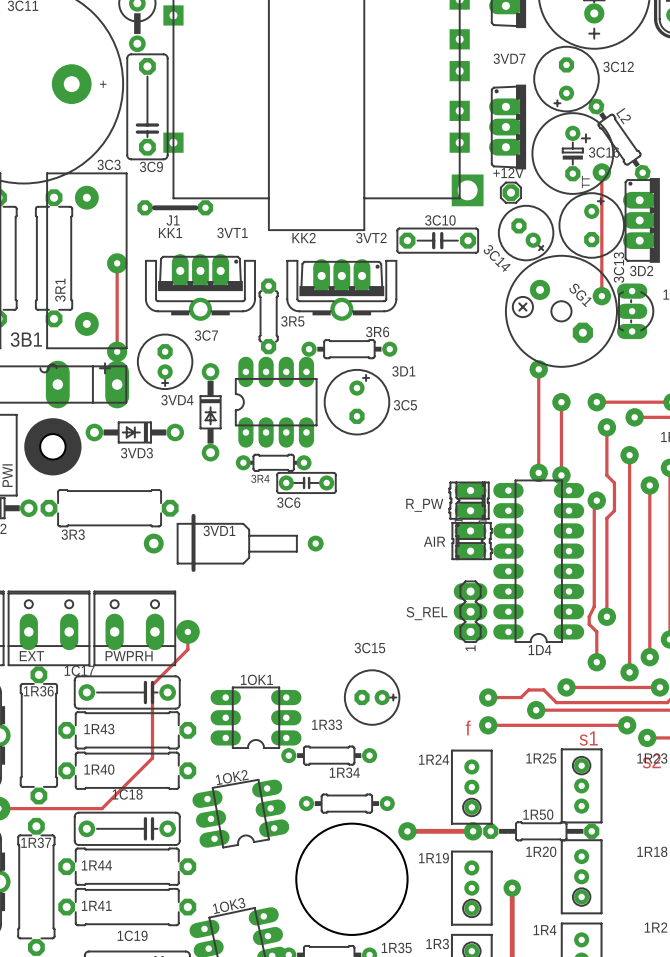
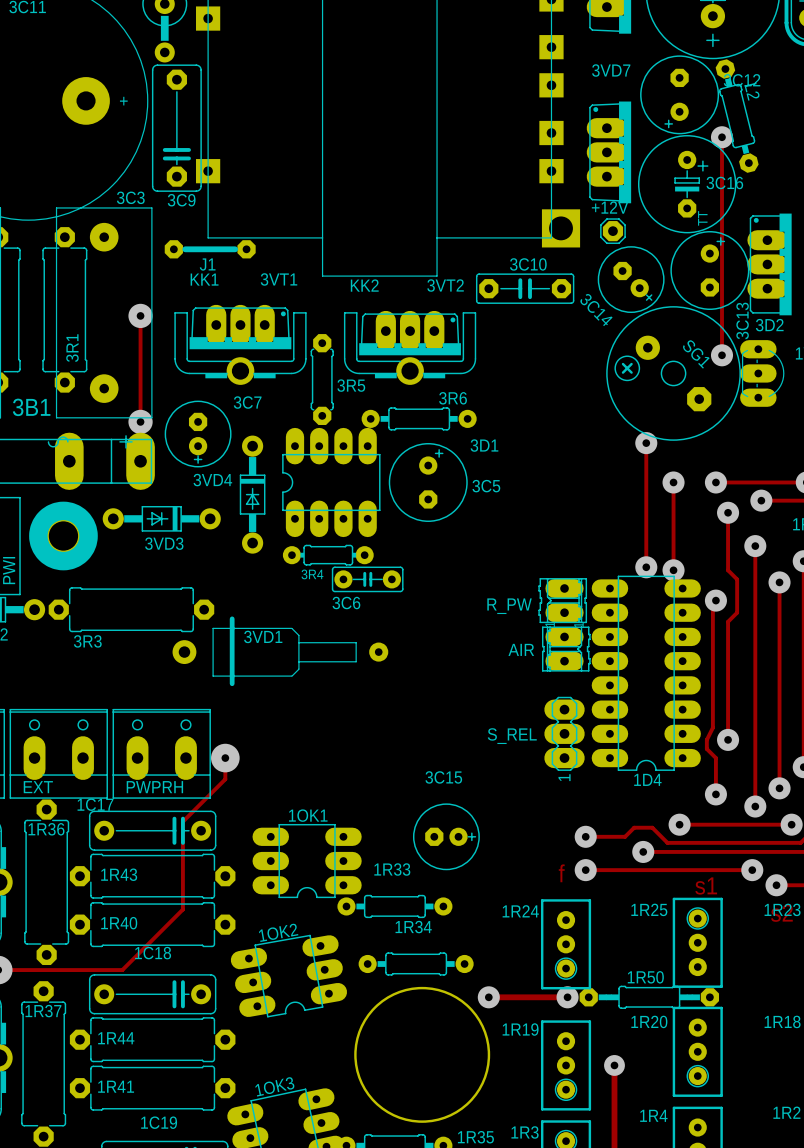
track: none -> (721, 137) (721, 206)
via: none -> (721, 137)
L2 rotation: 0° (619, 139) -> 21° clockwise (737, 116)
via: (601, 172) -> none

